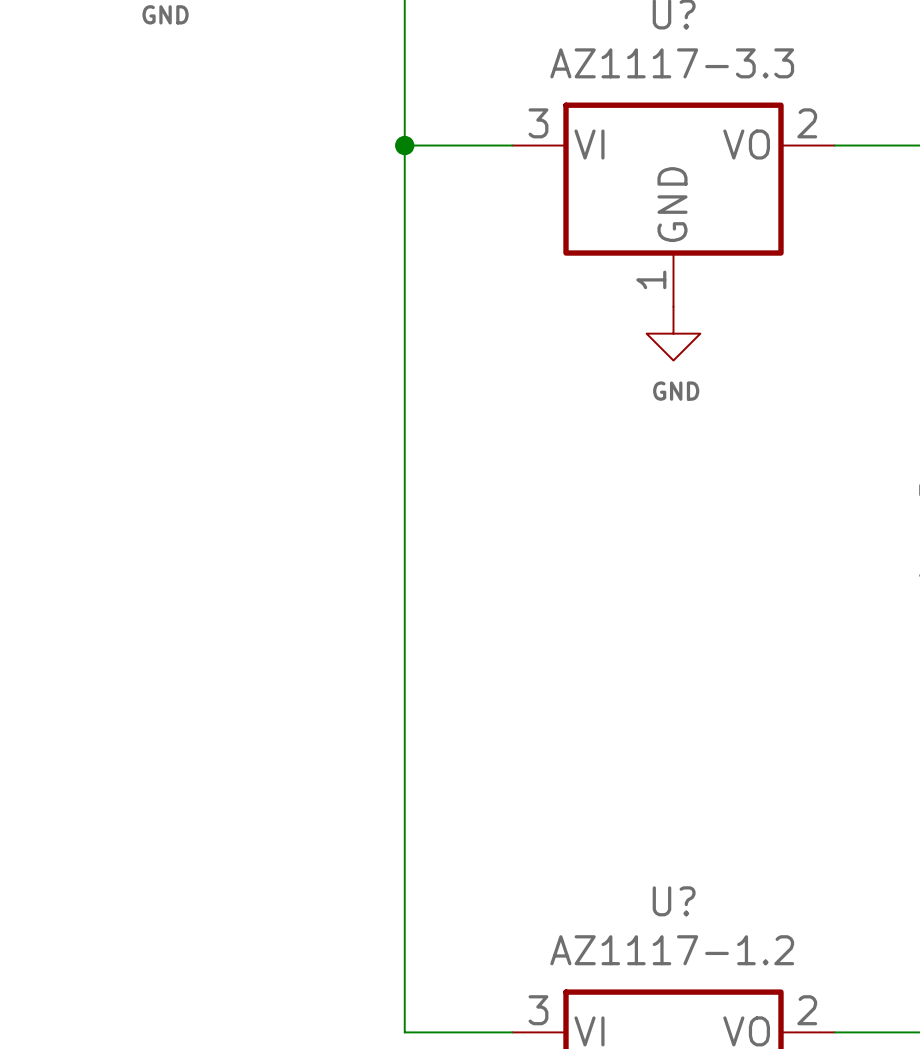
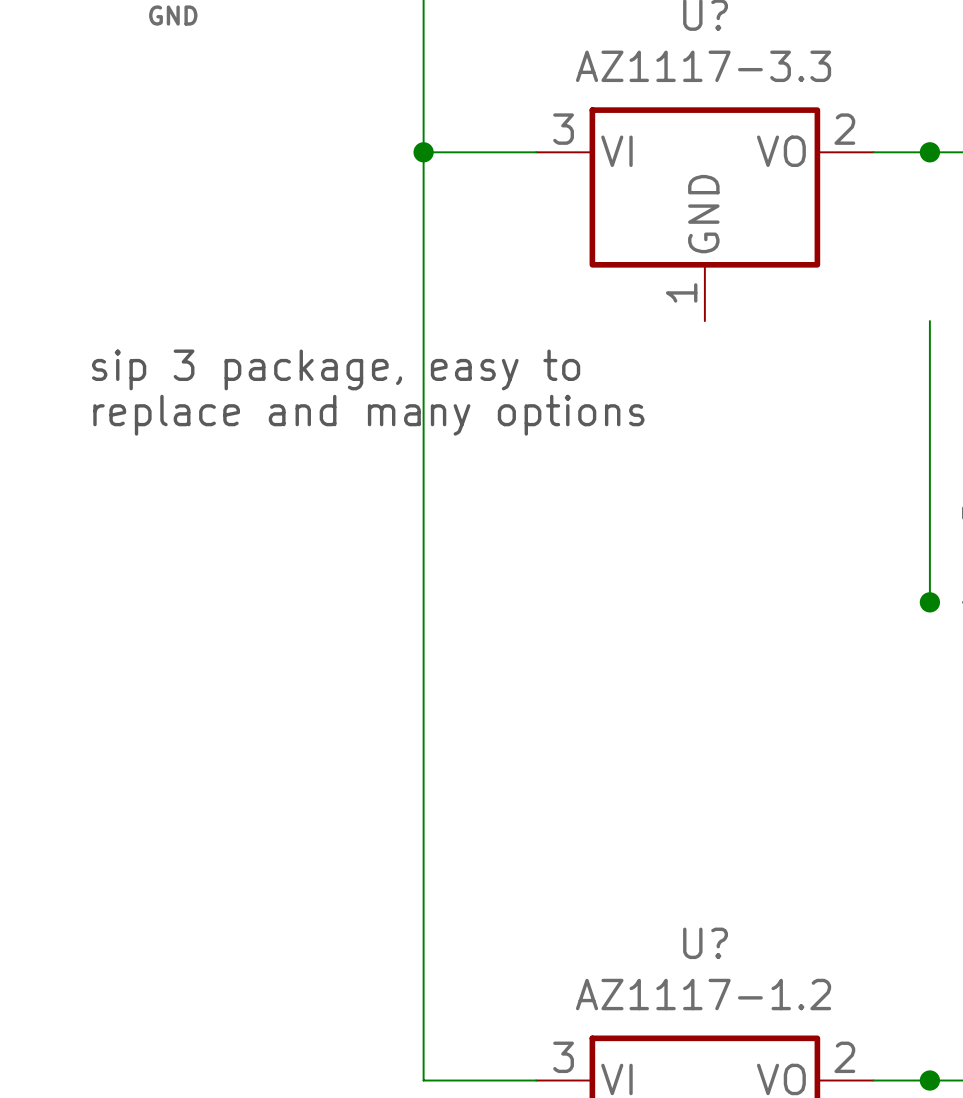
junction: none -> (929, 152)
wire: none -> (929, 321) (929, 602)
power symbol: GND (673, 333) -> none
text: none -> sip 3 package, easy to (336, 369)
text: none -> replace and many options (368, 415)
junction: none -> (929, 602)
junction: none -> (929, 1080)

